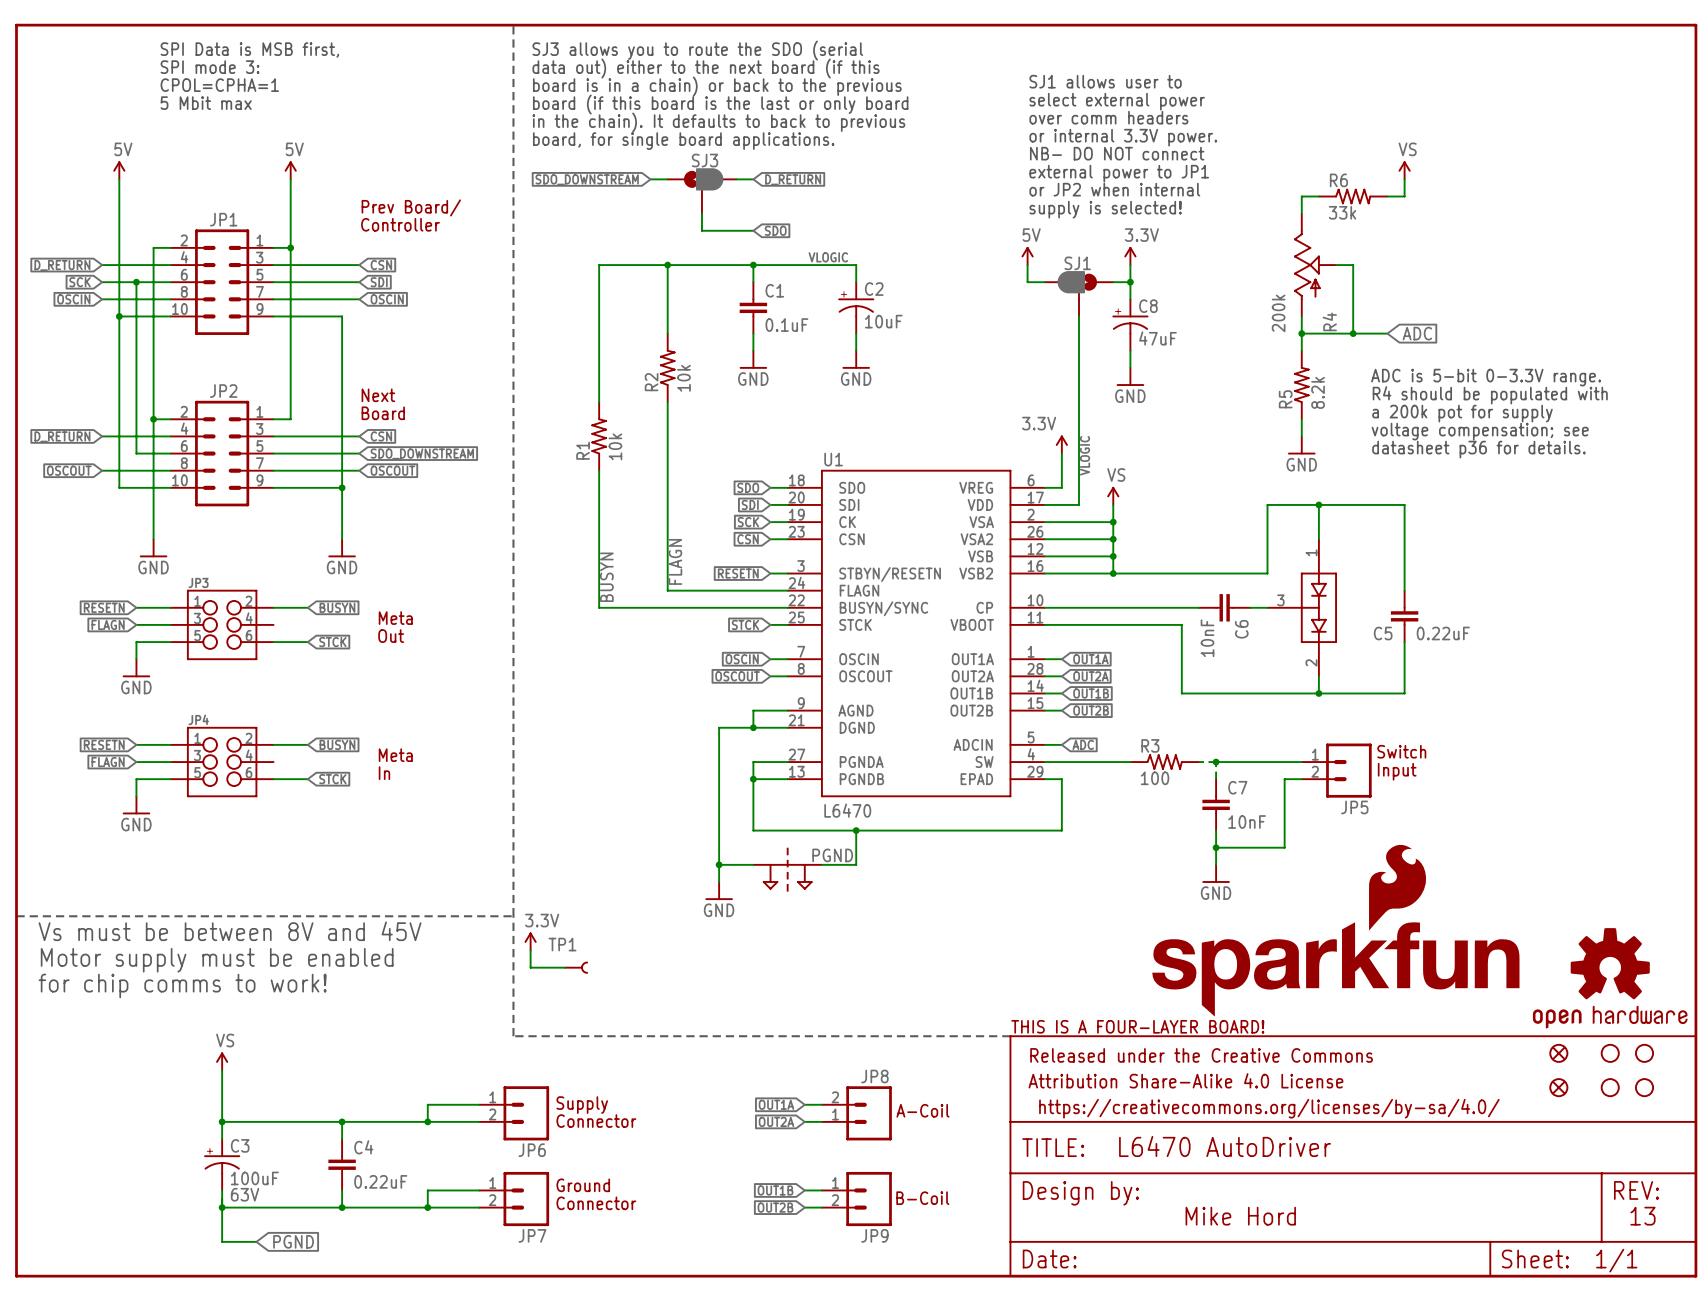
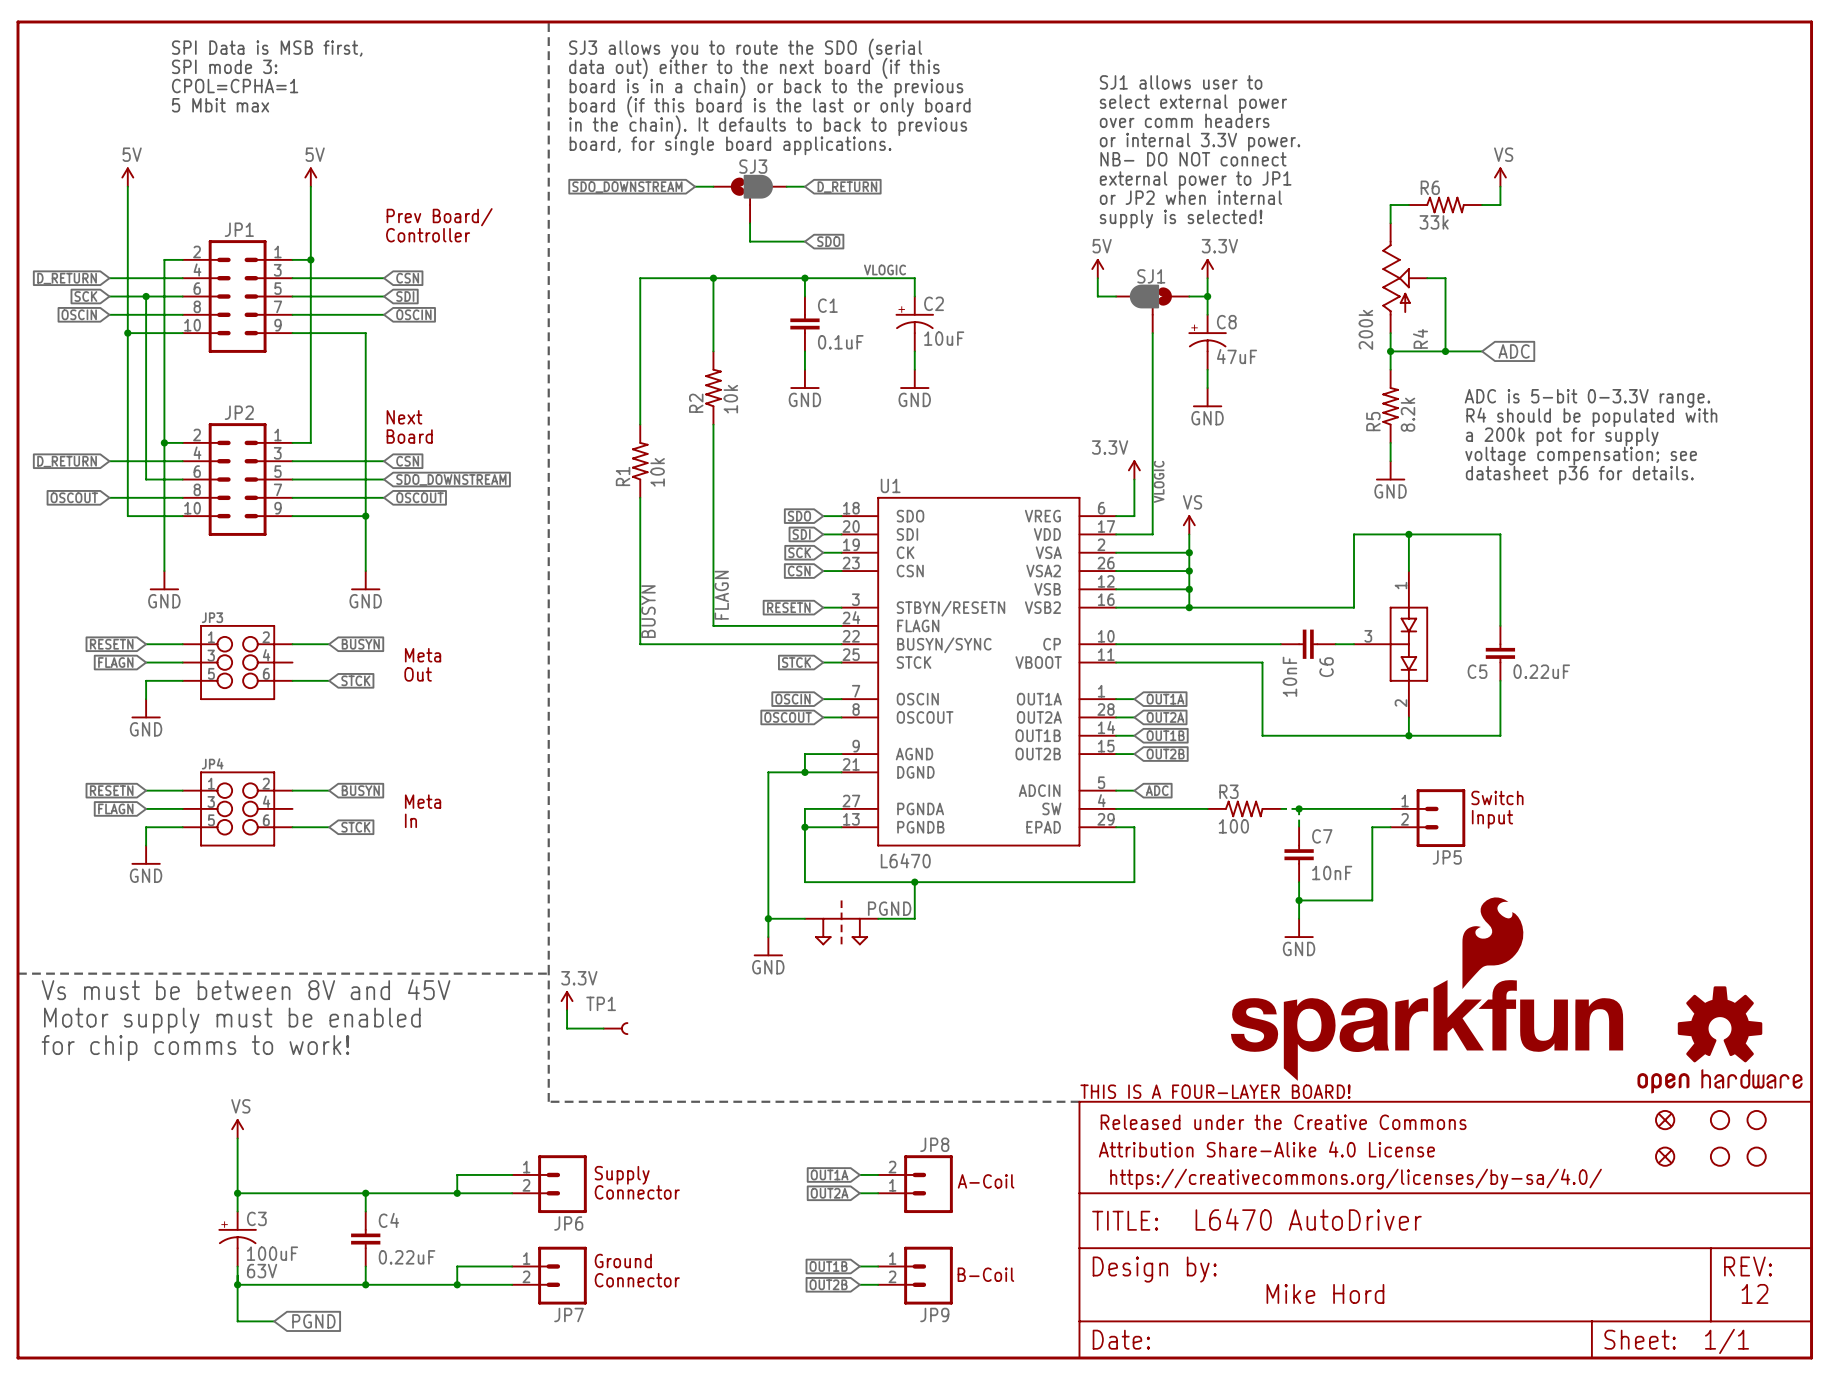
text: 13 (1642, 1216) -> 12 (1754, 1293)

